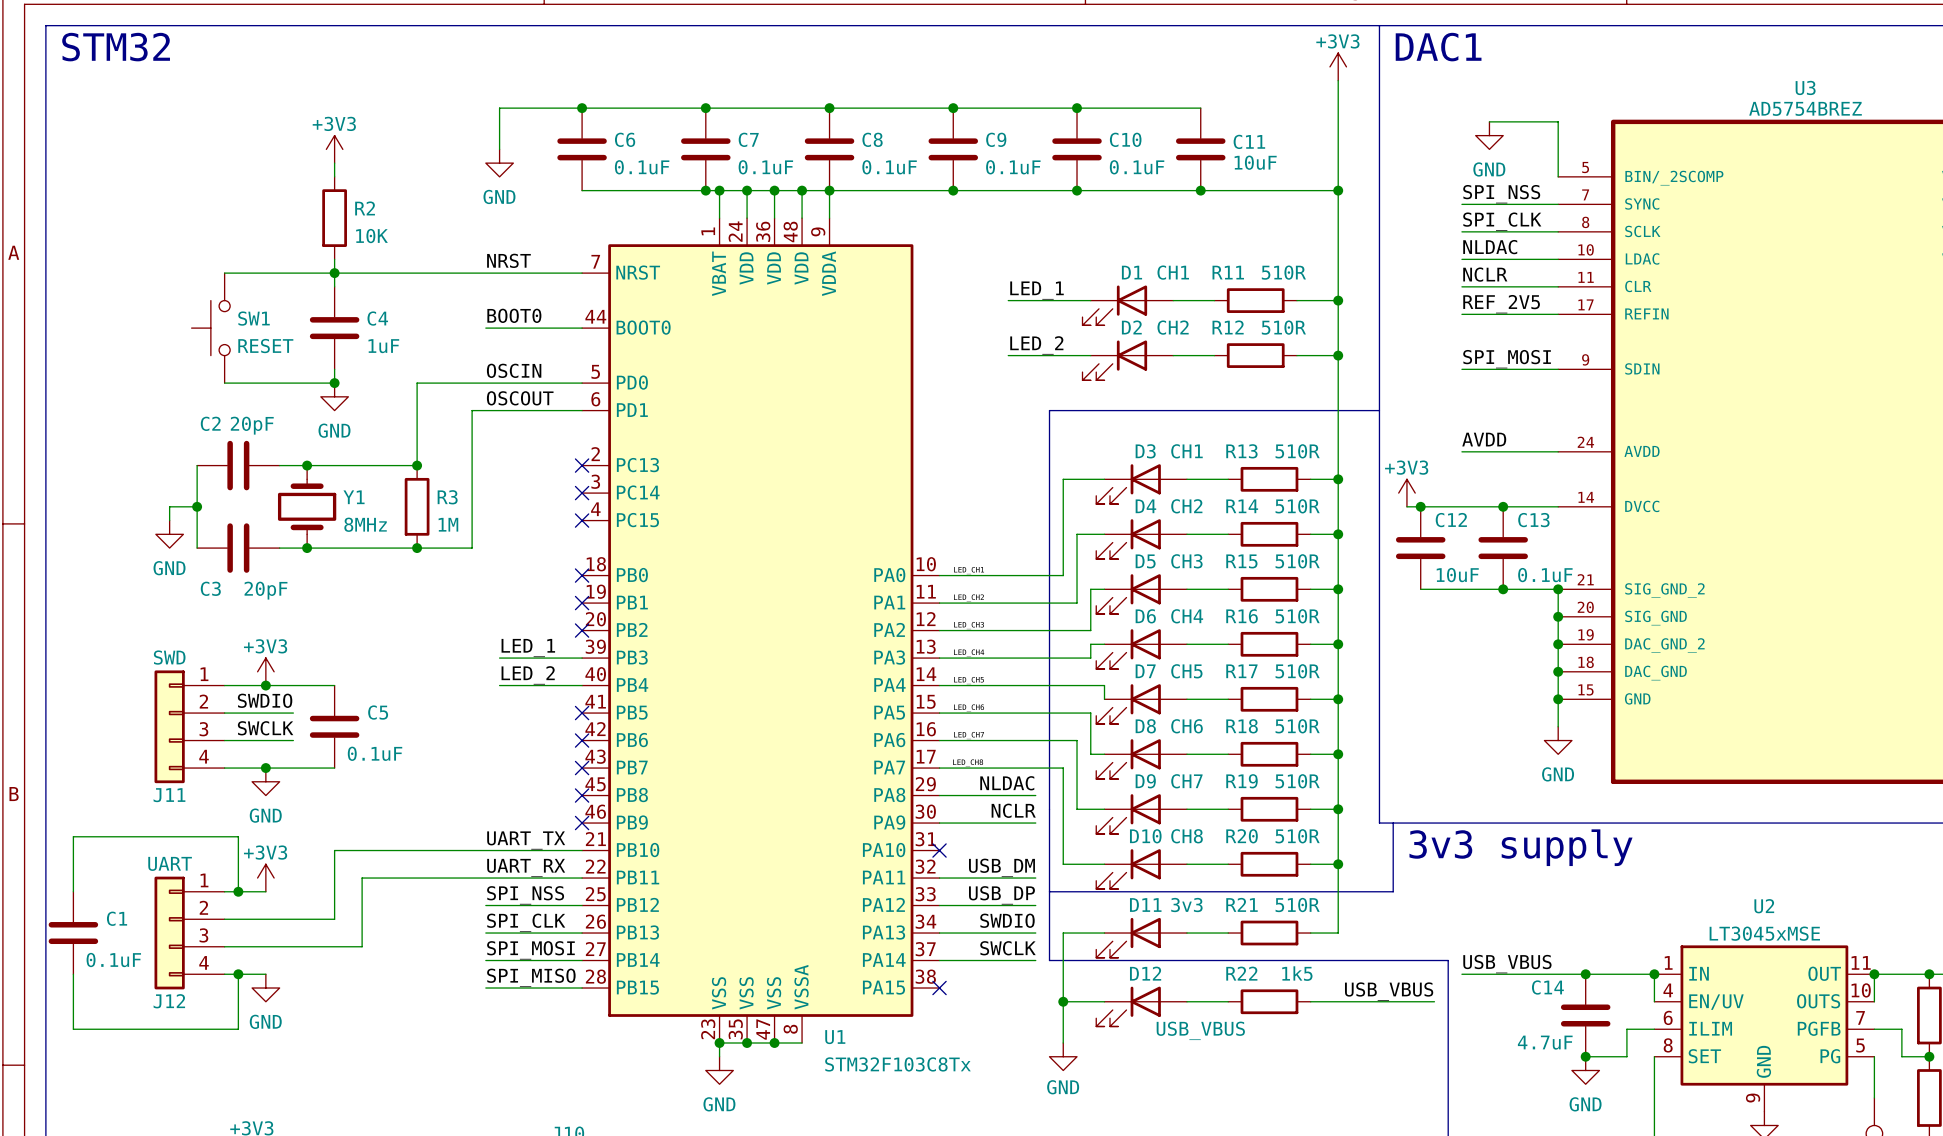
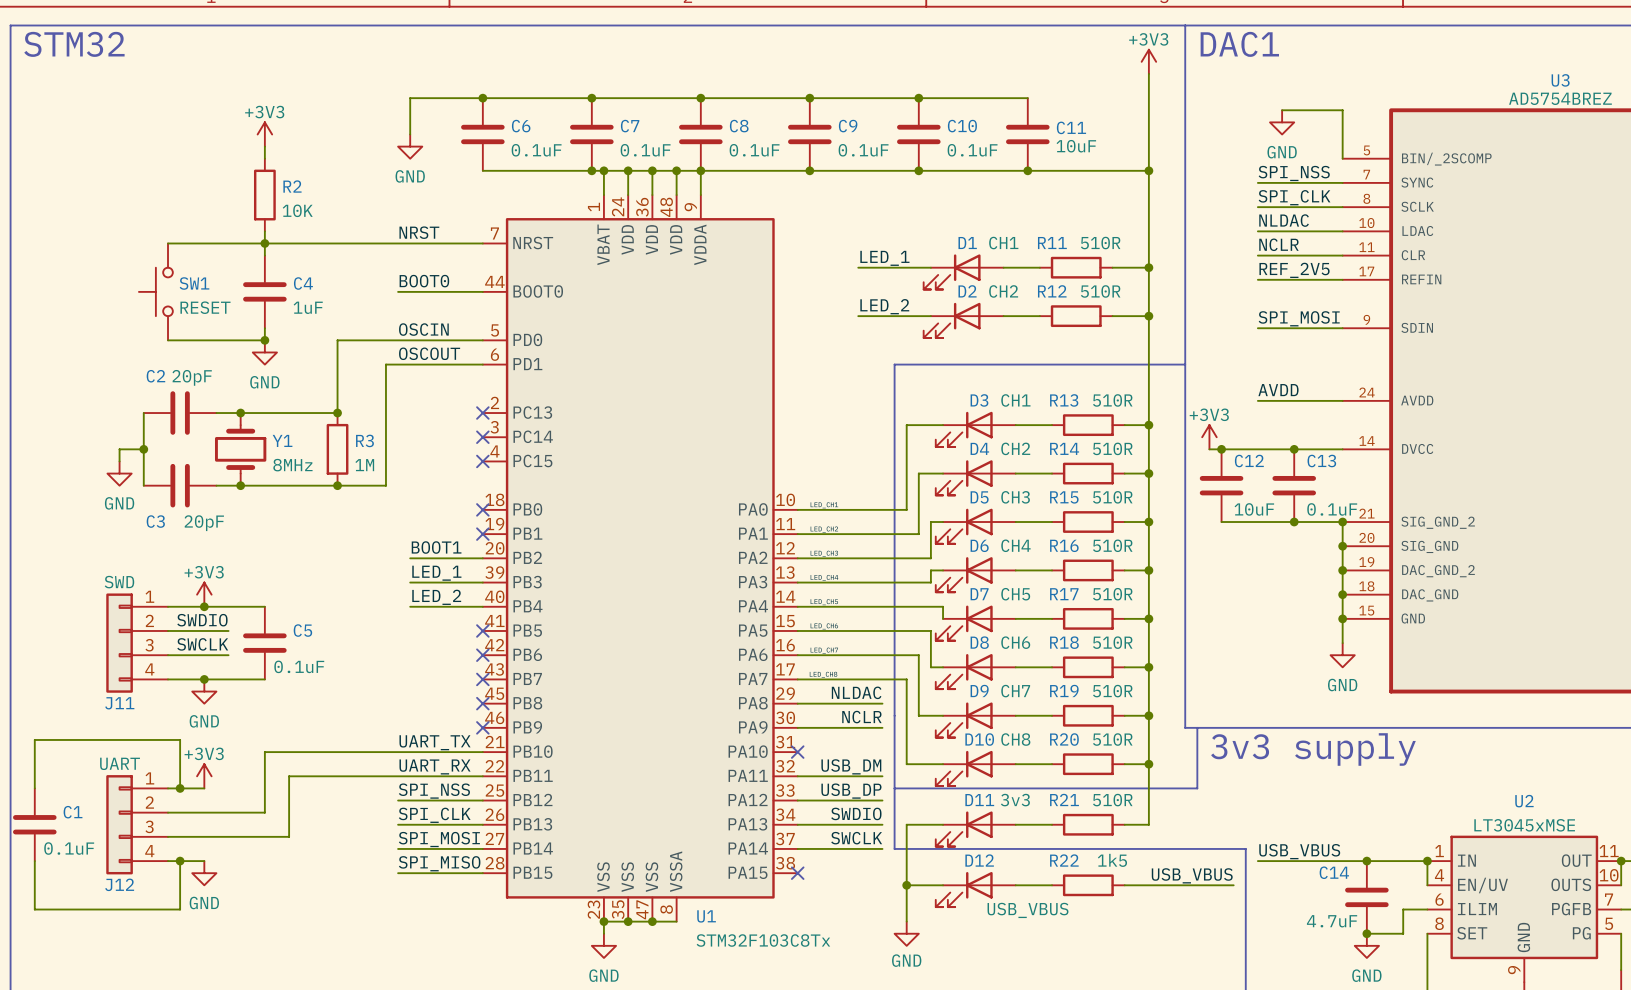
label: none -> BOOT1 (436, 547)
wire: none -> (410, 558) (482, 558)
no-connect mark: (582, 630) -> none

